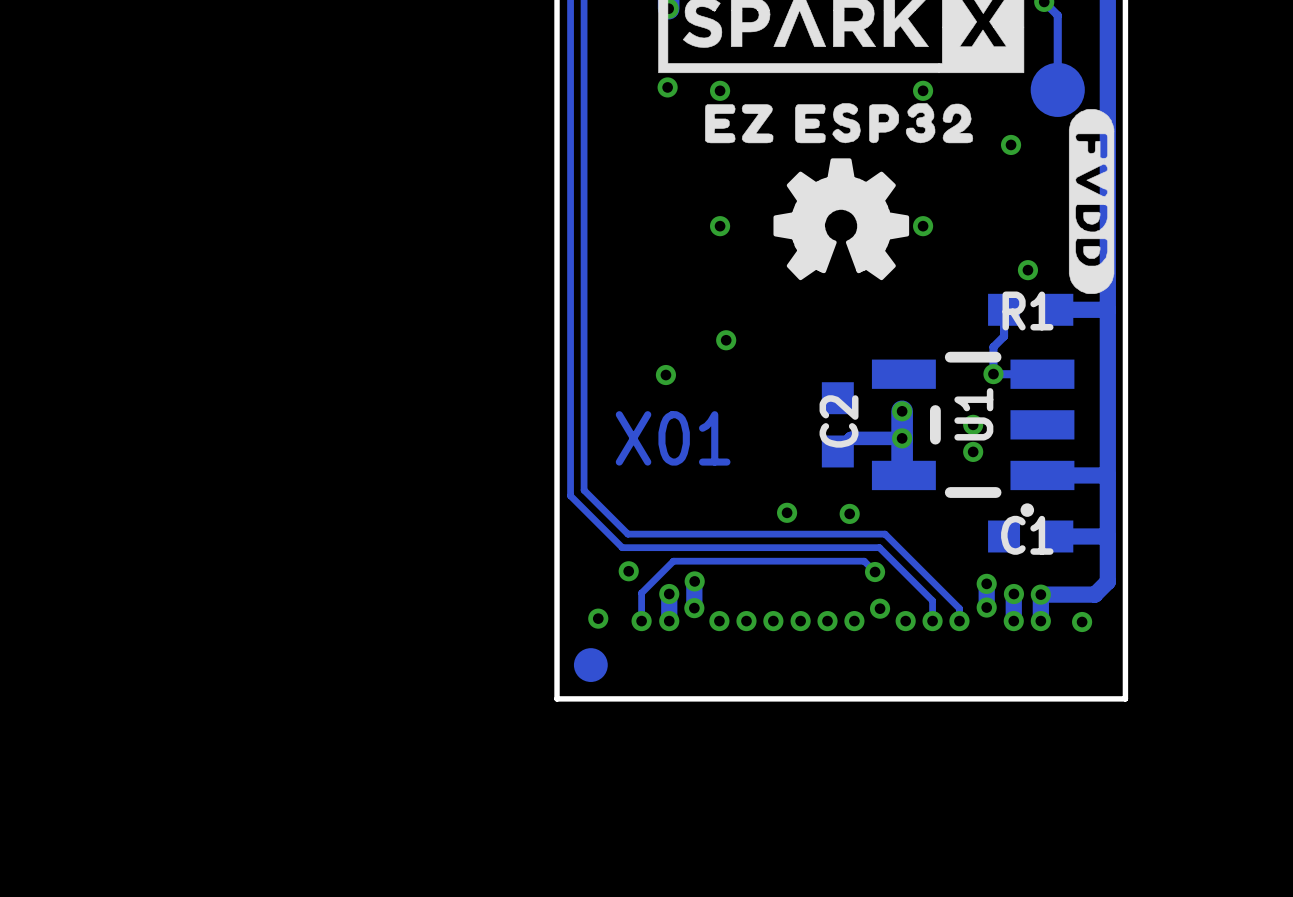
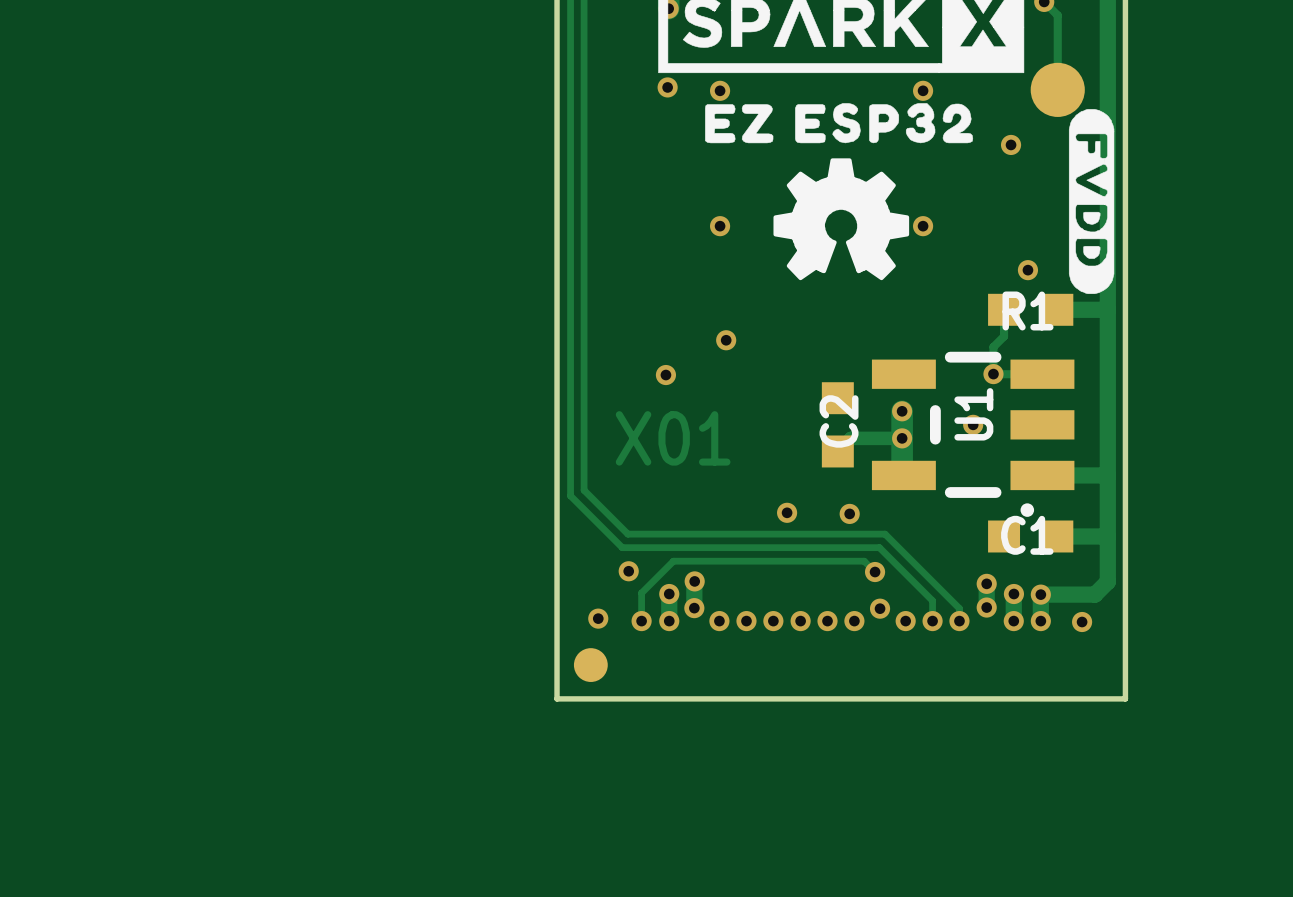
via: (973, 451) -> none

